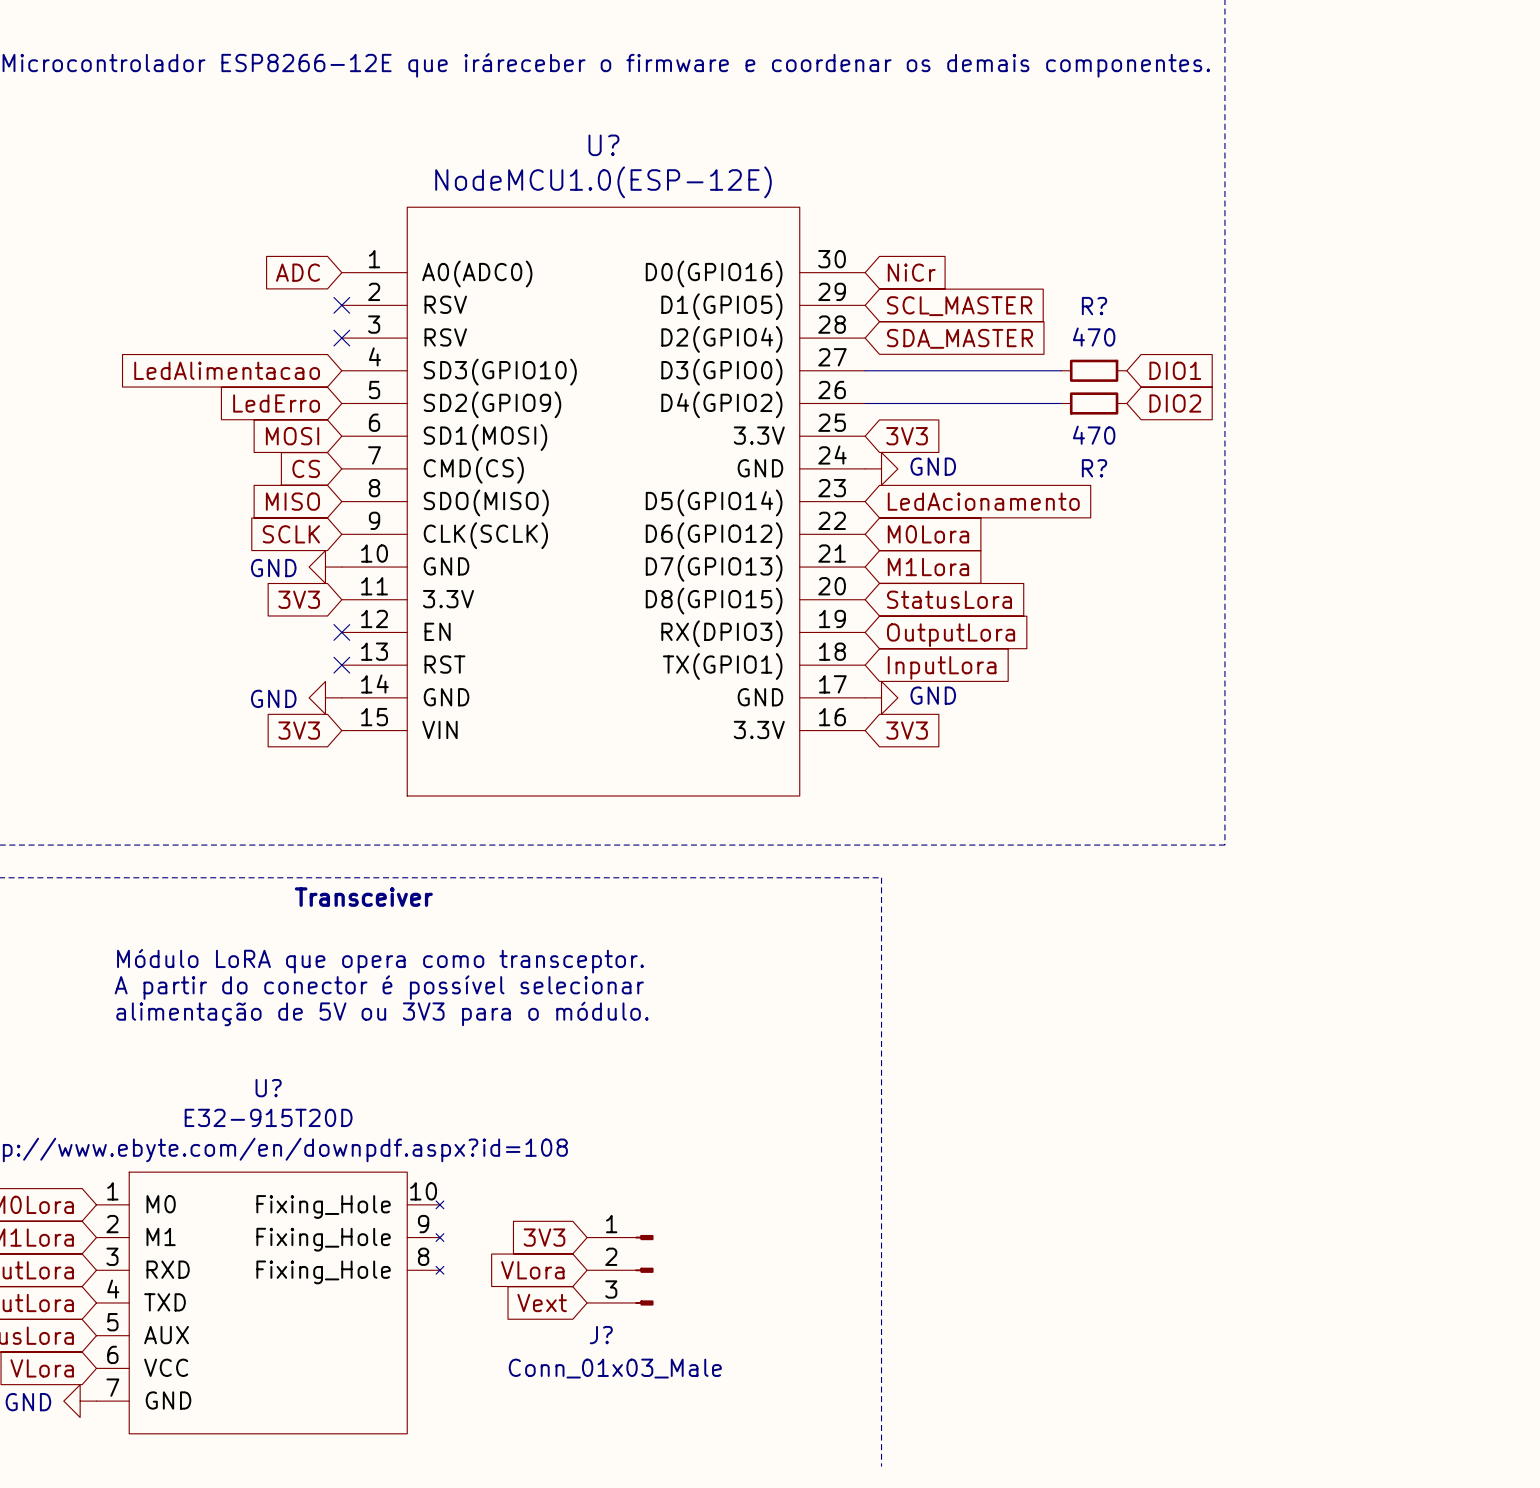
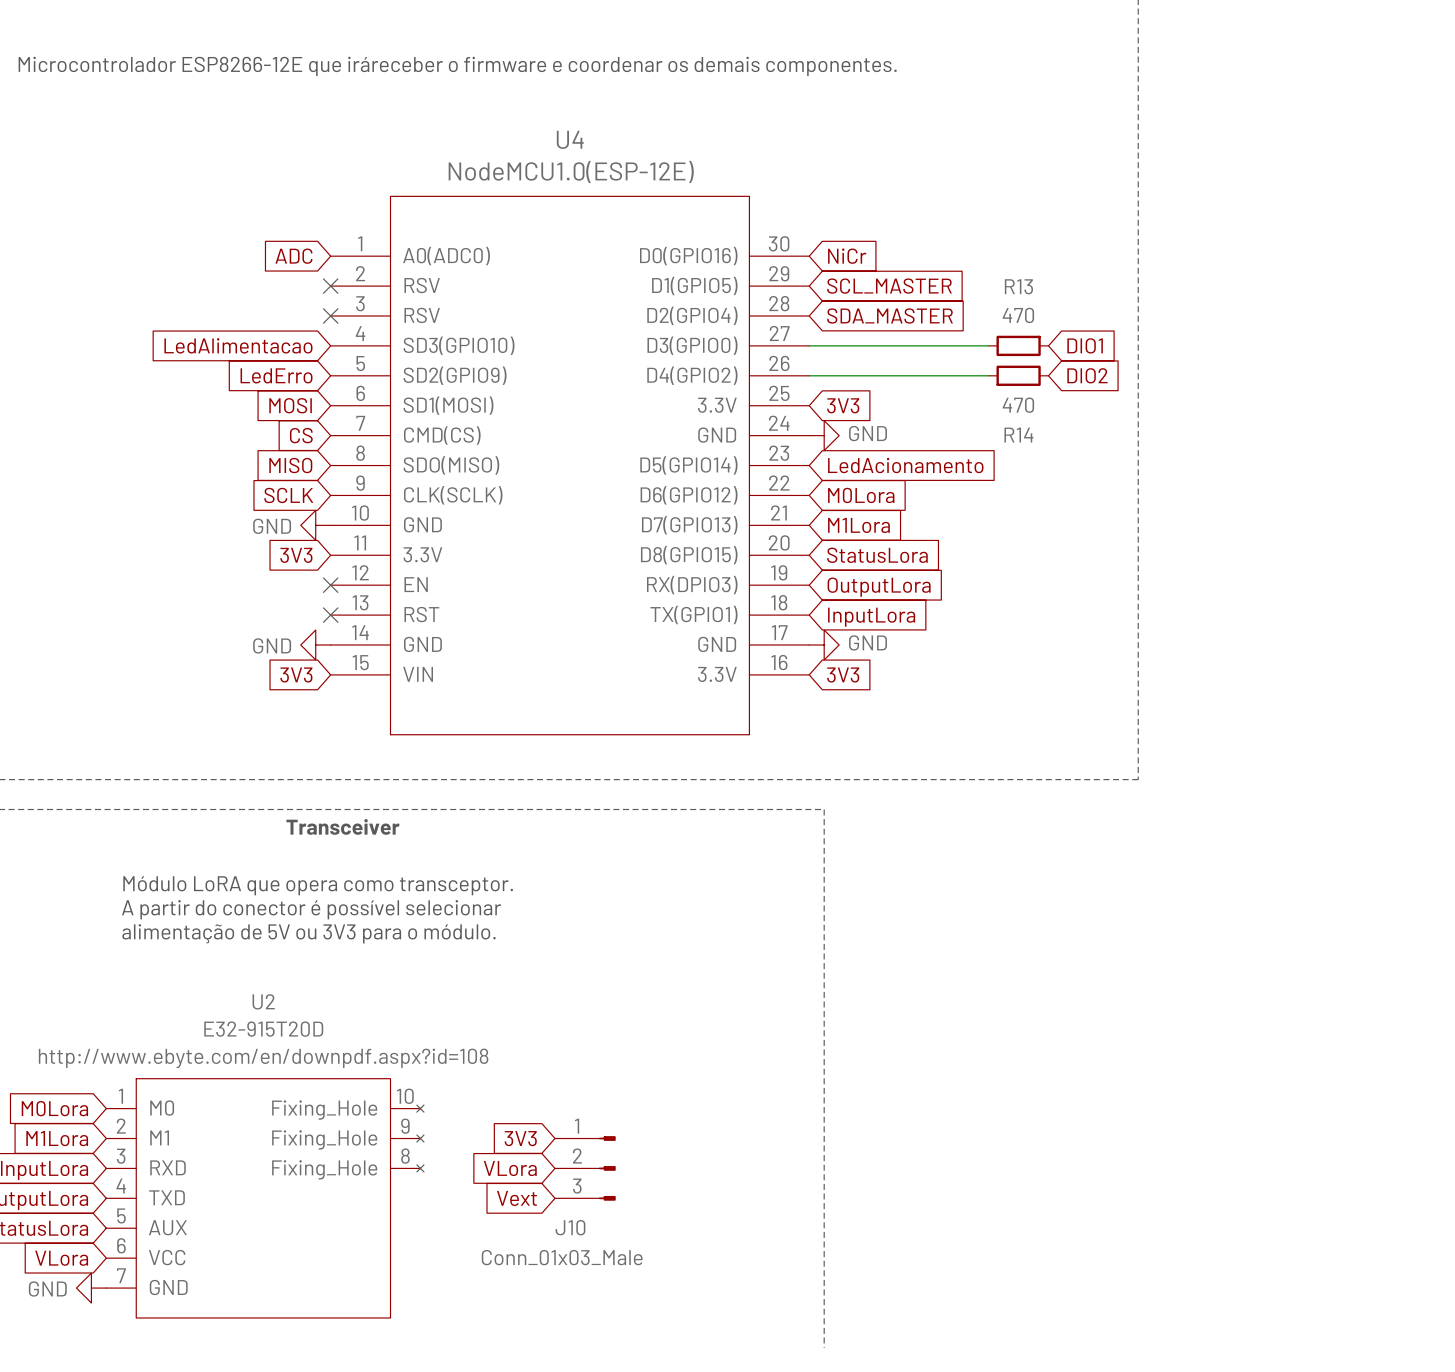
U? name: U? (603, 145) -> U4 (570, 139)
R? name: R? (1094, 306) -> R13 (1018, 286)
R? name: R? (1094, 468) -> R14 (1018, 435)
U? name: U? (268, 1088) -> U2 (263, 1001)
J? name: J? (601, 1335) -> J10 (570, 1227)

